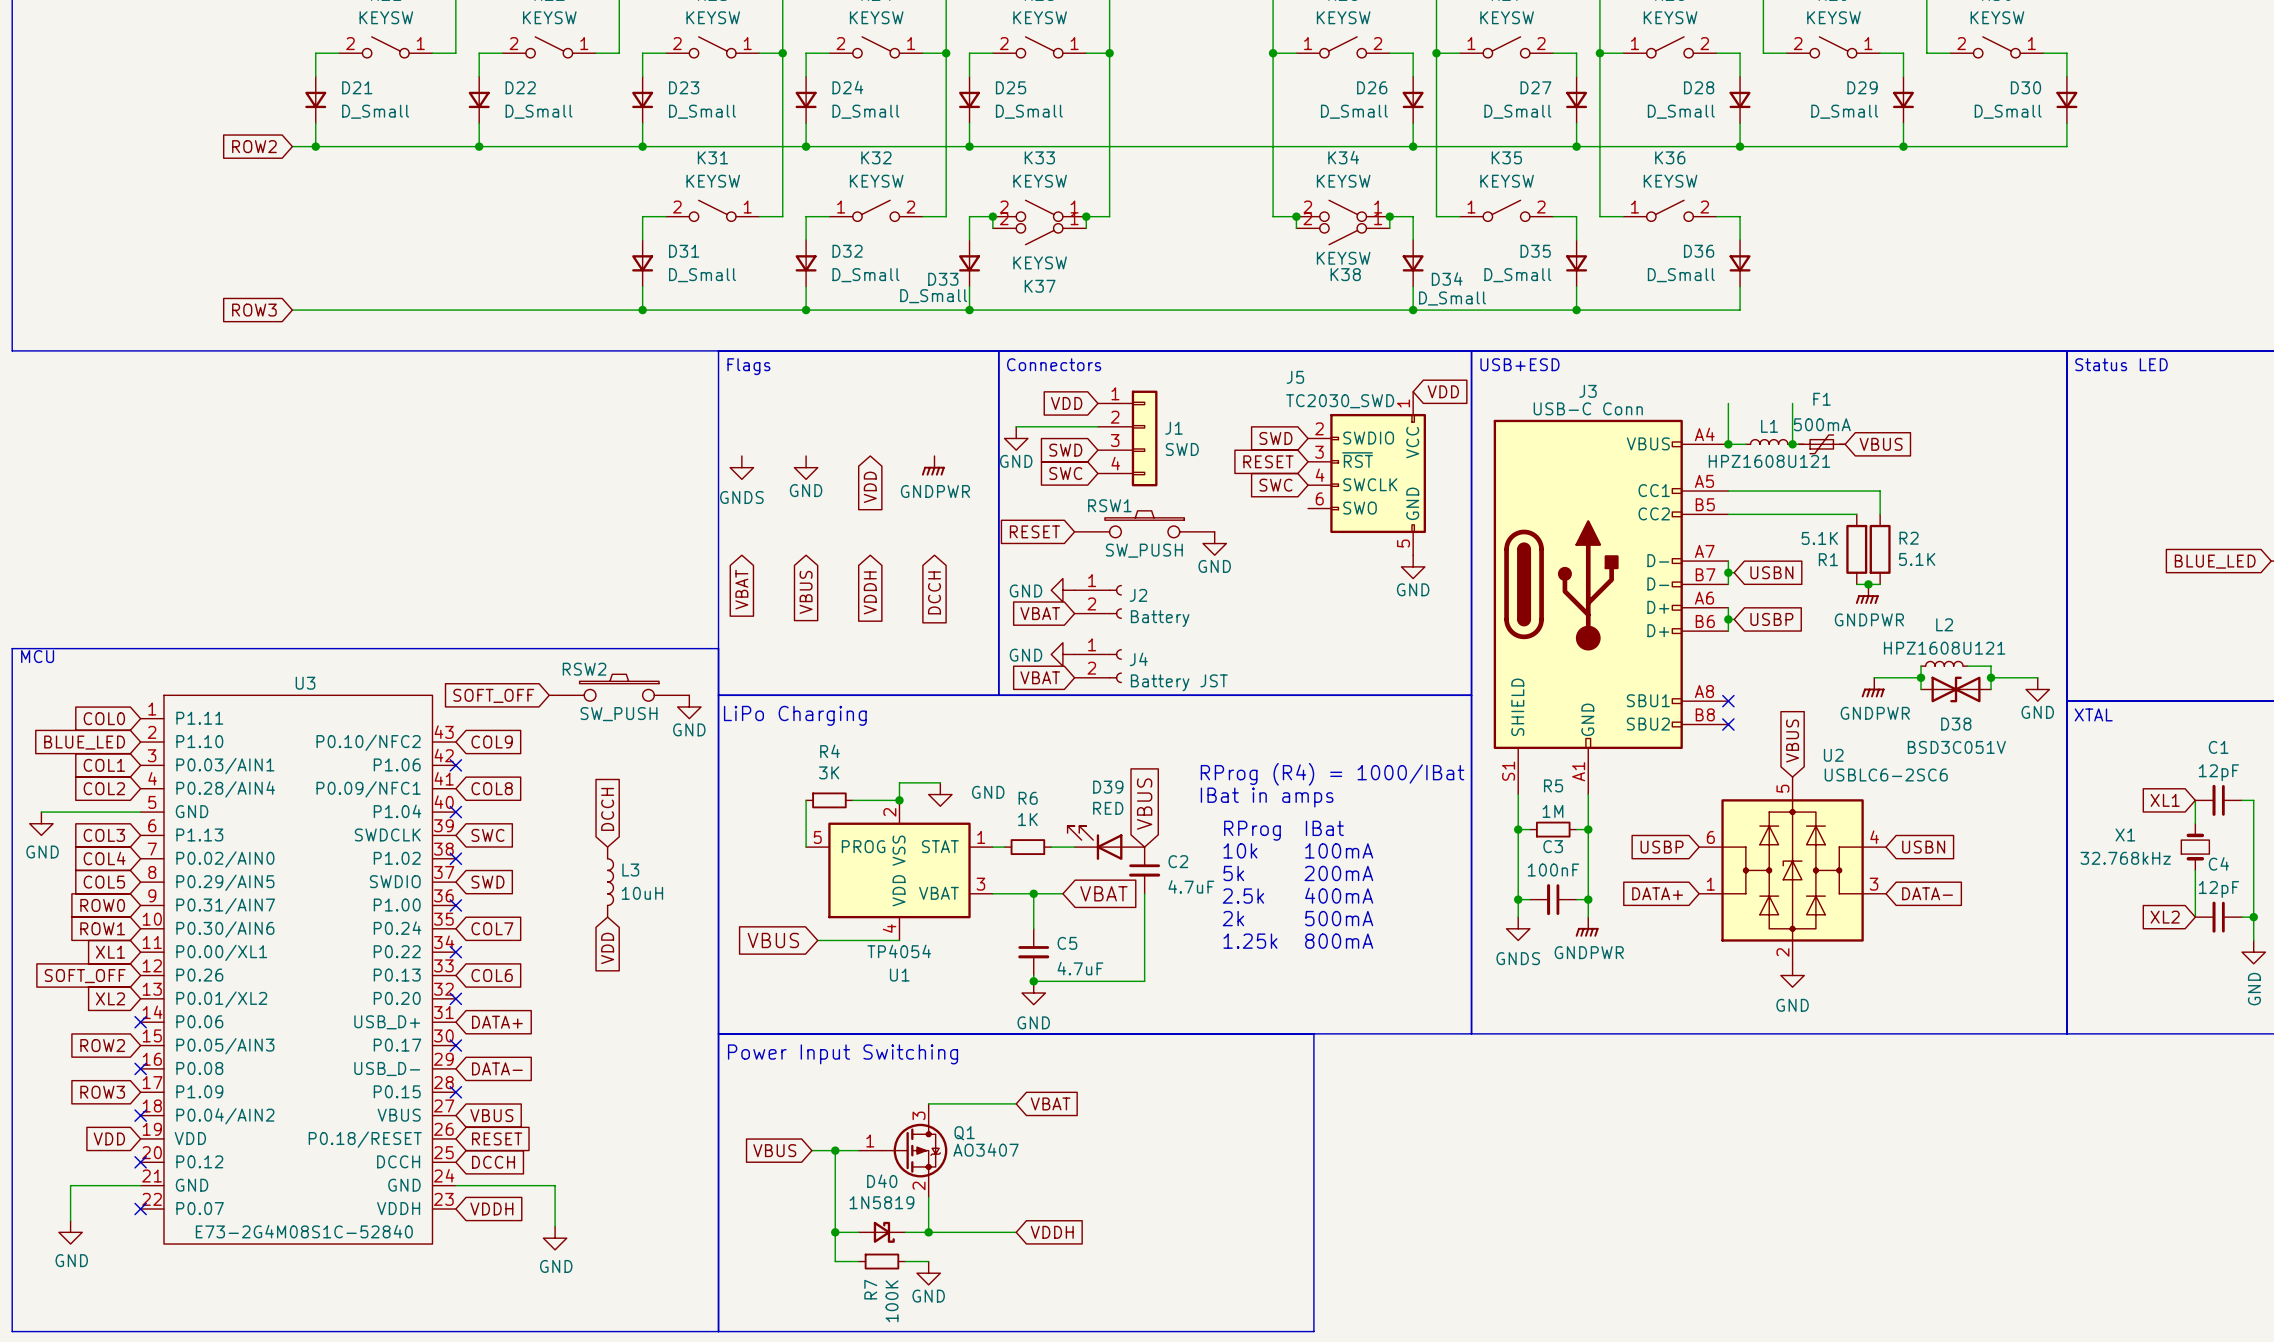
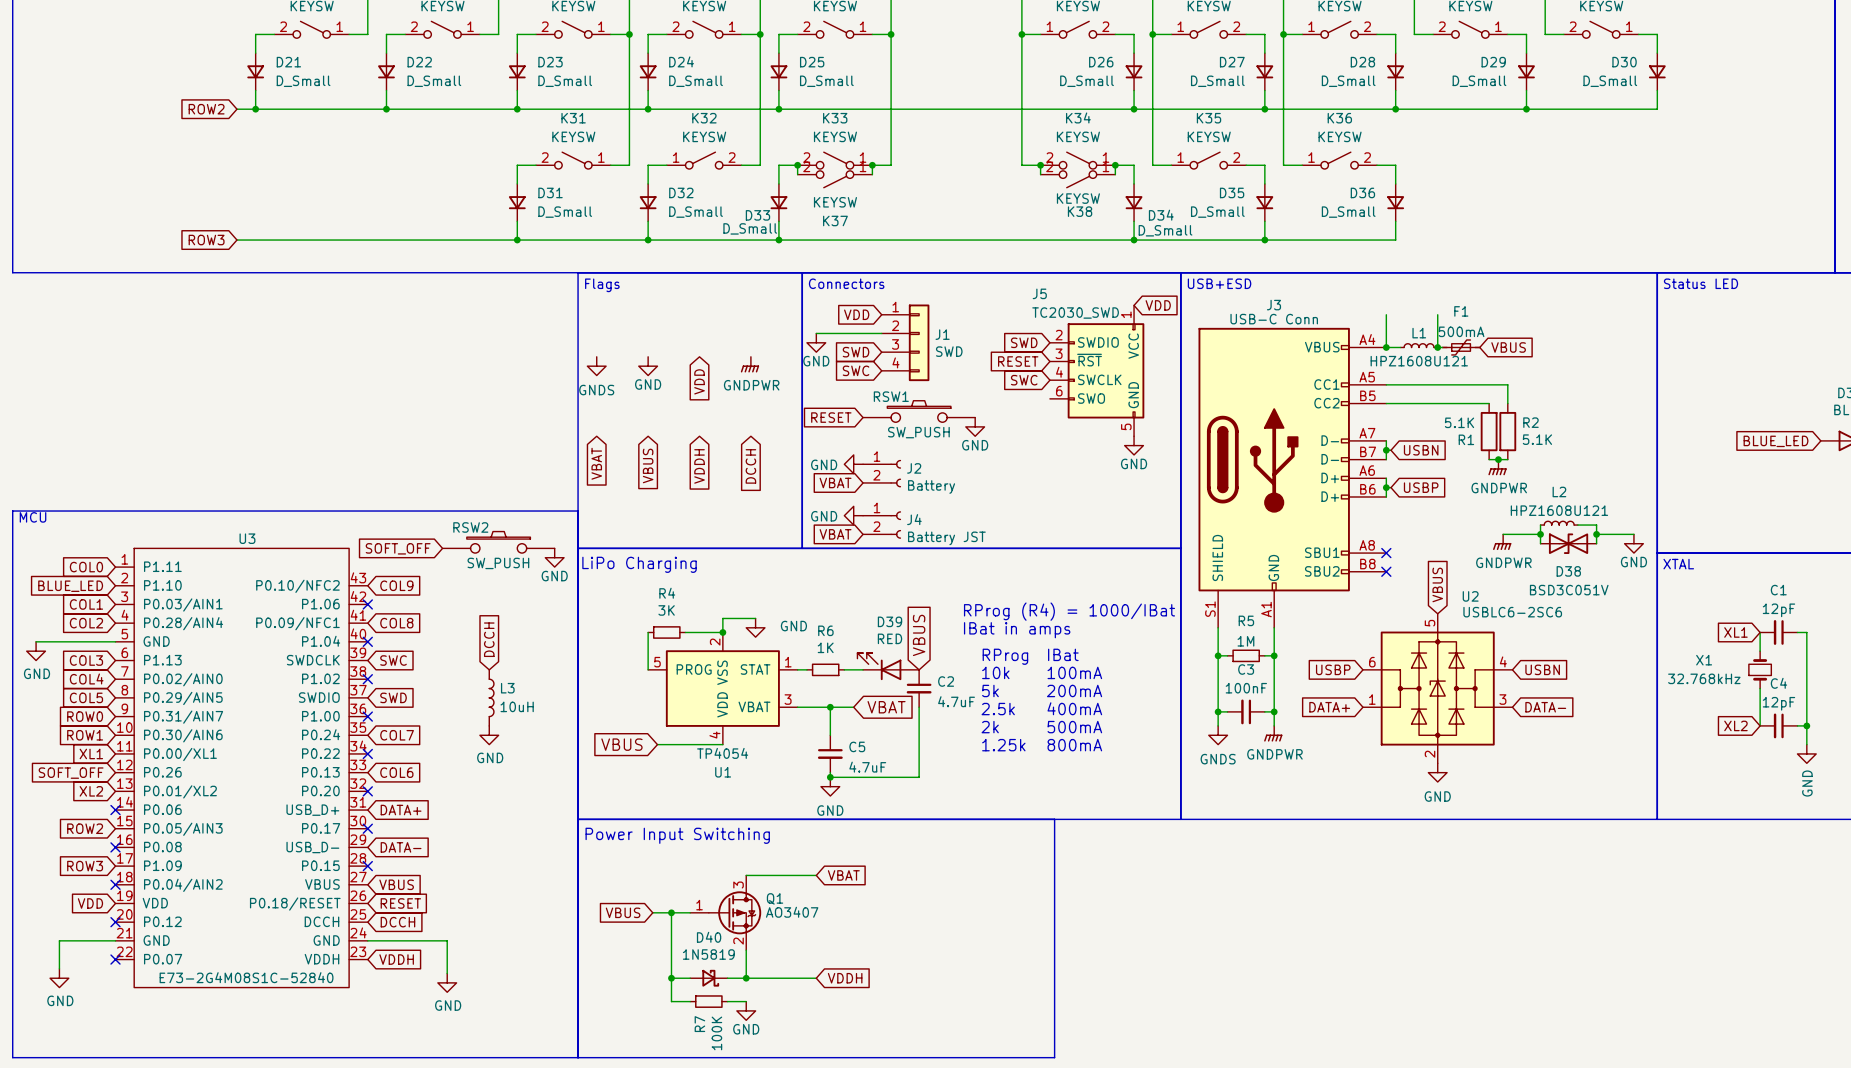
power symbol: none -> GND (489, 735)
global label: VDD (607, 948) -> none

